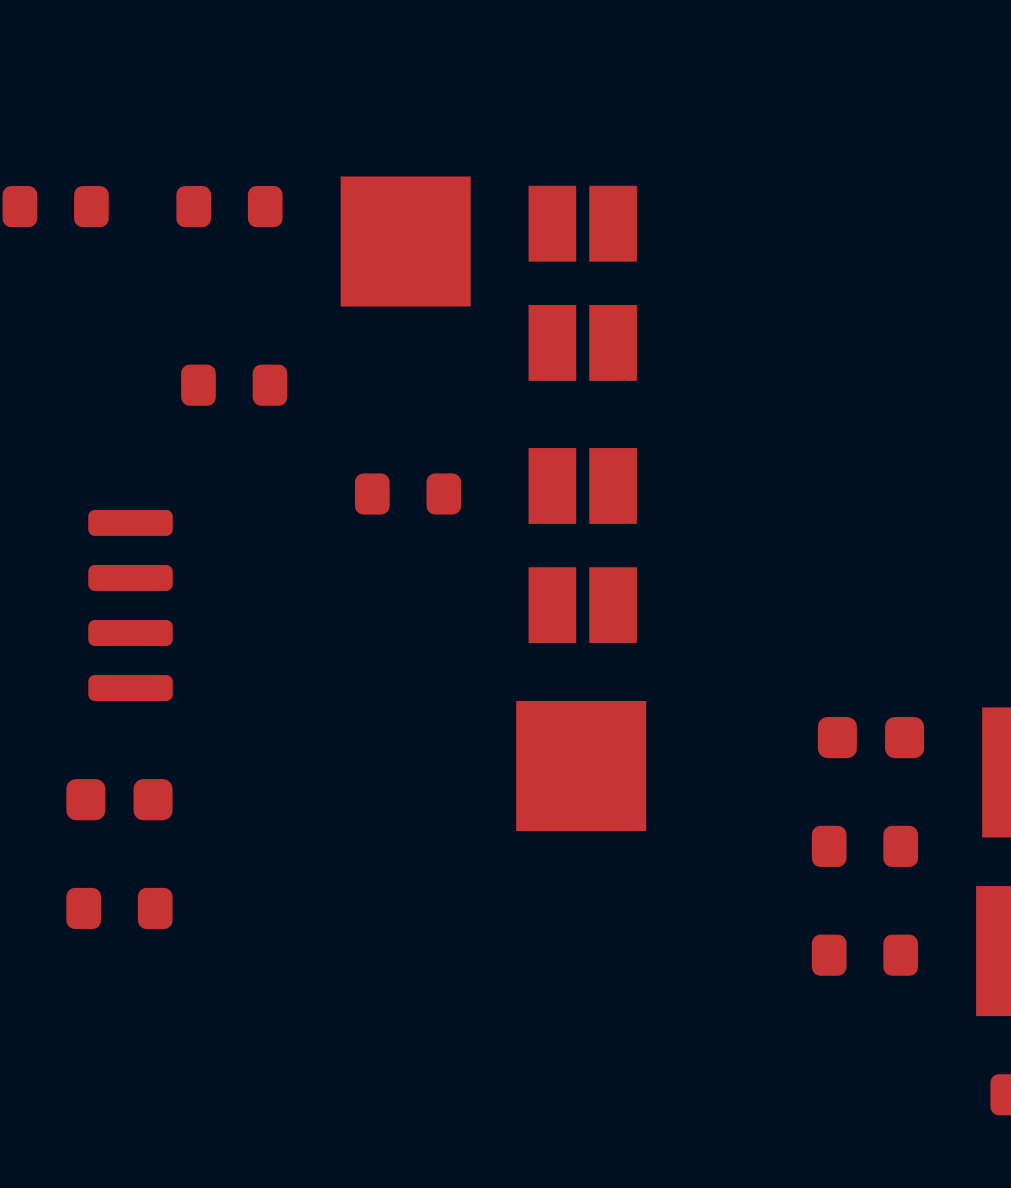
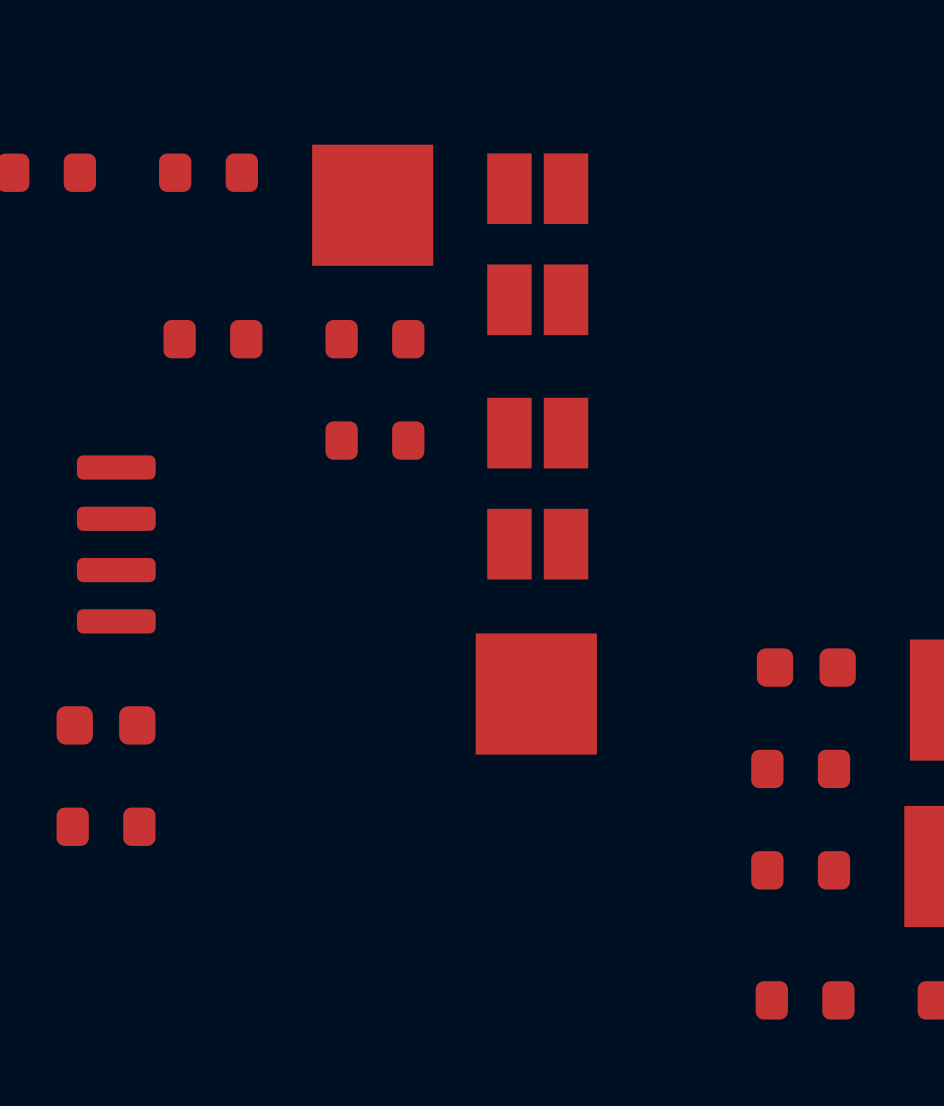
part: none -> (374, 339)
part: none -> (805, 1000)

